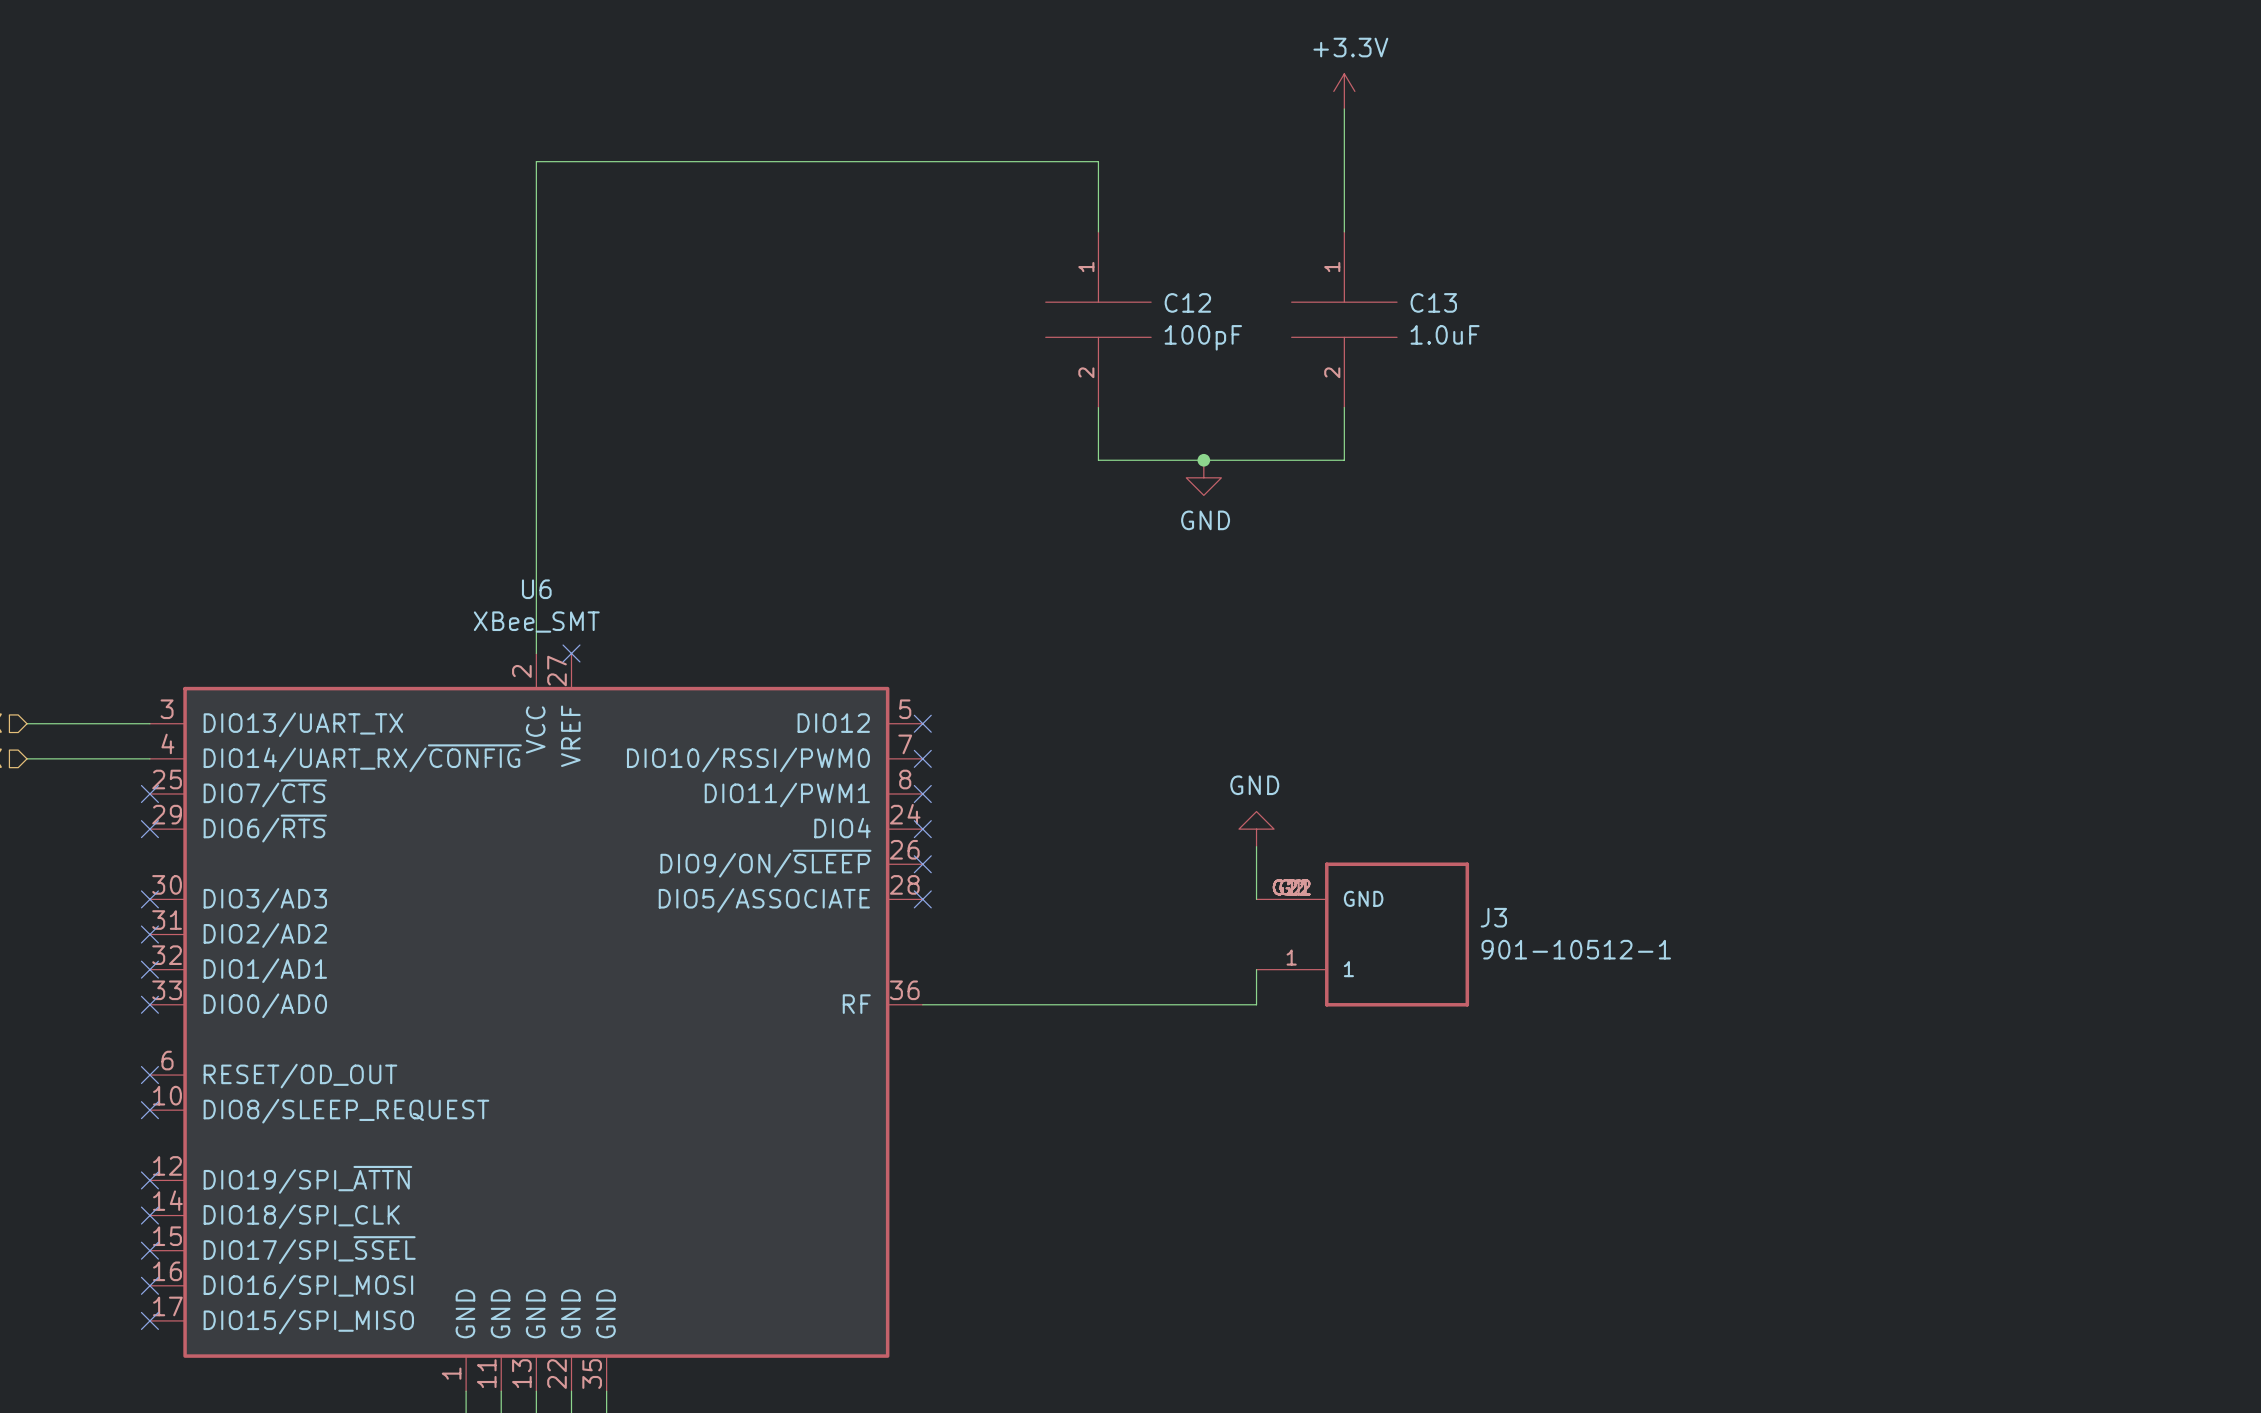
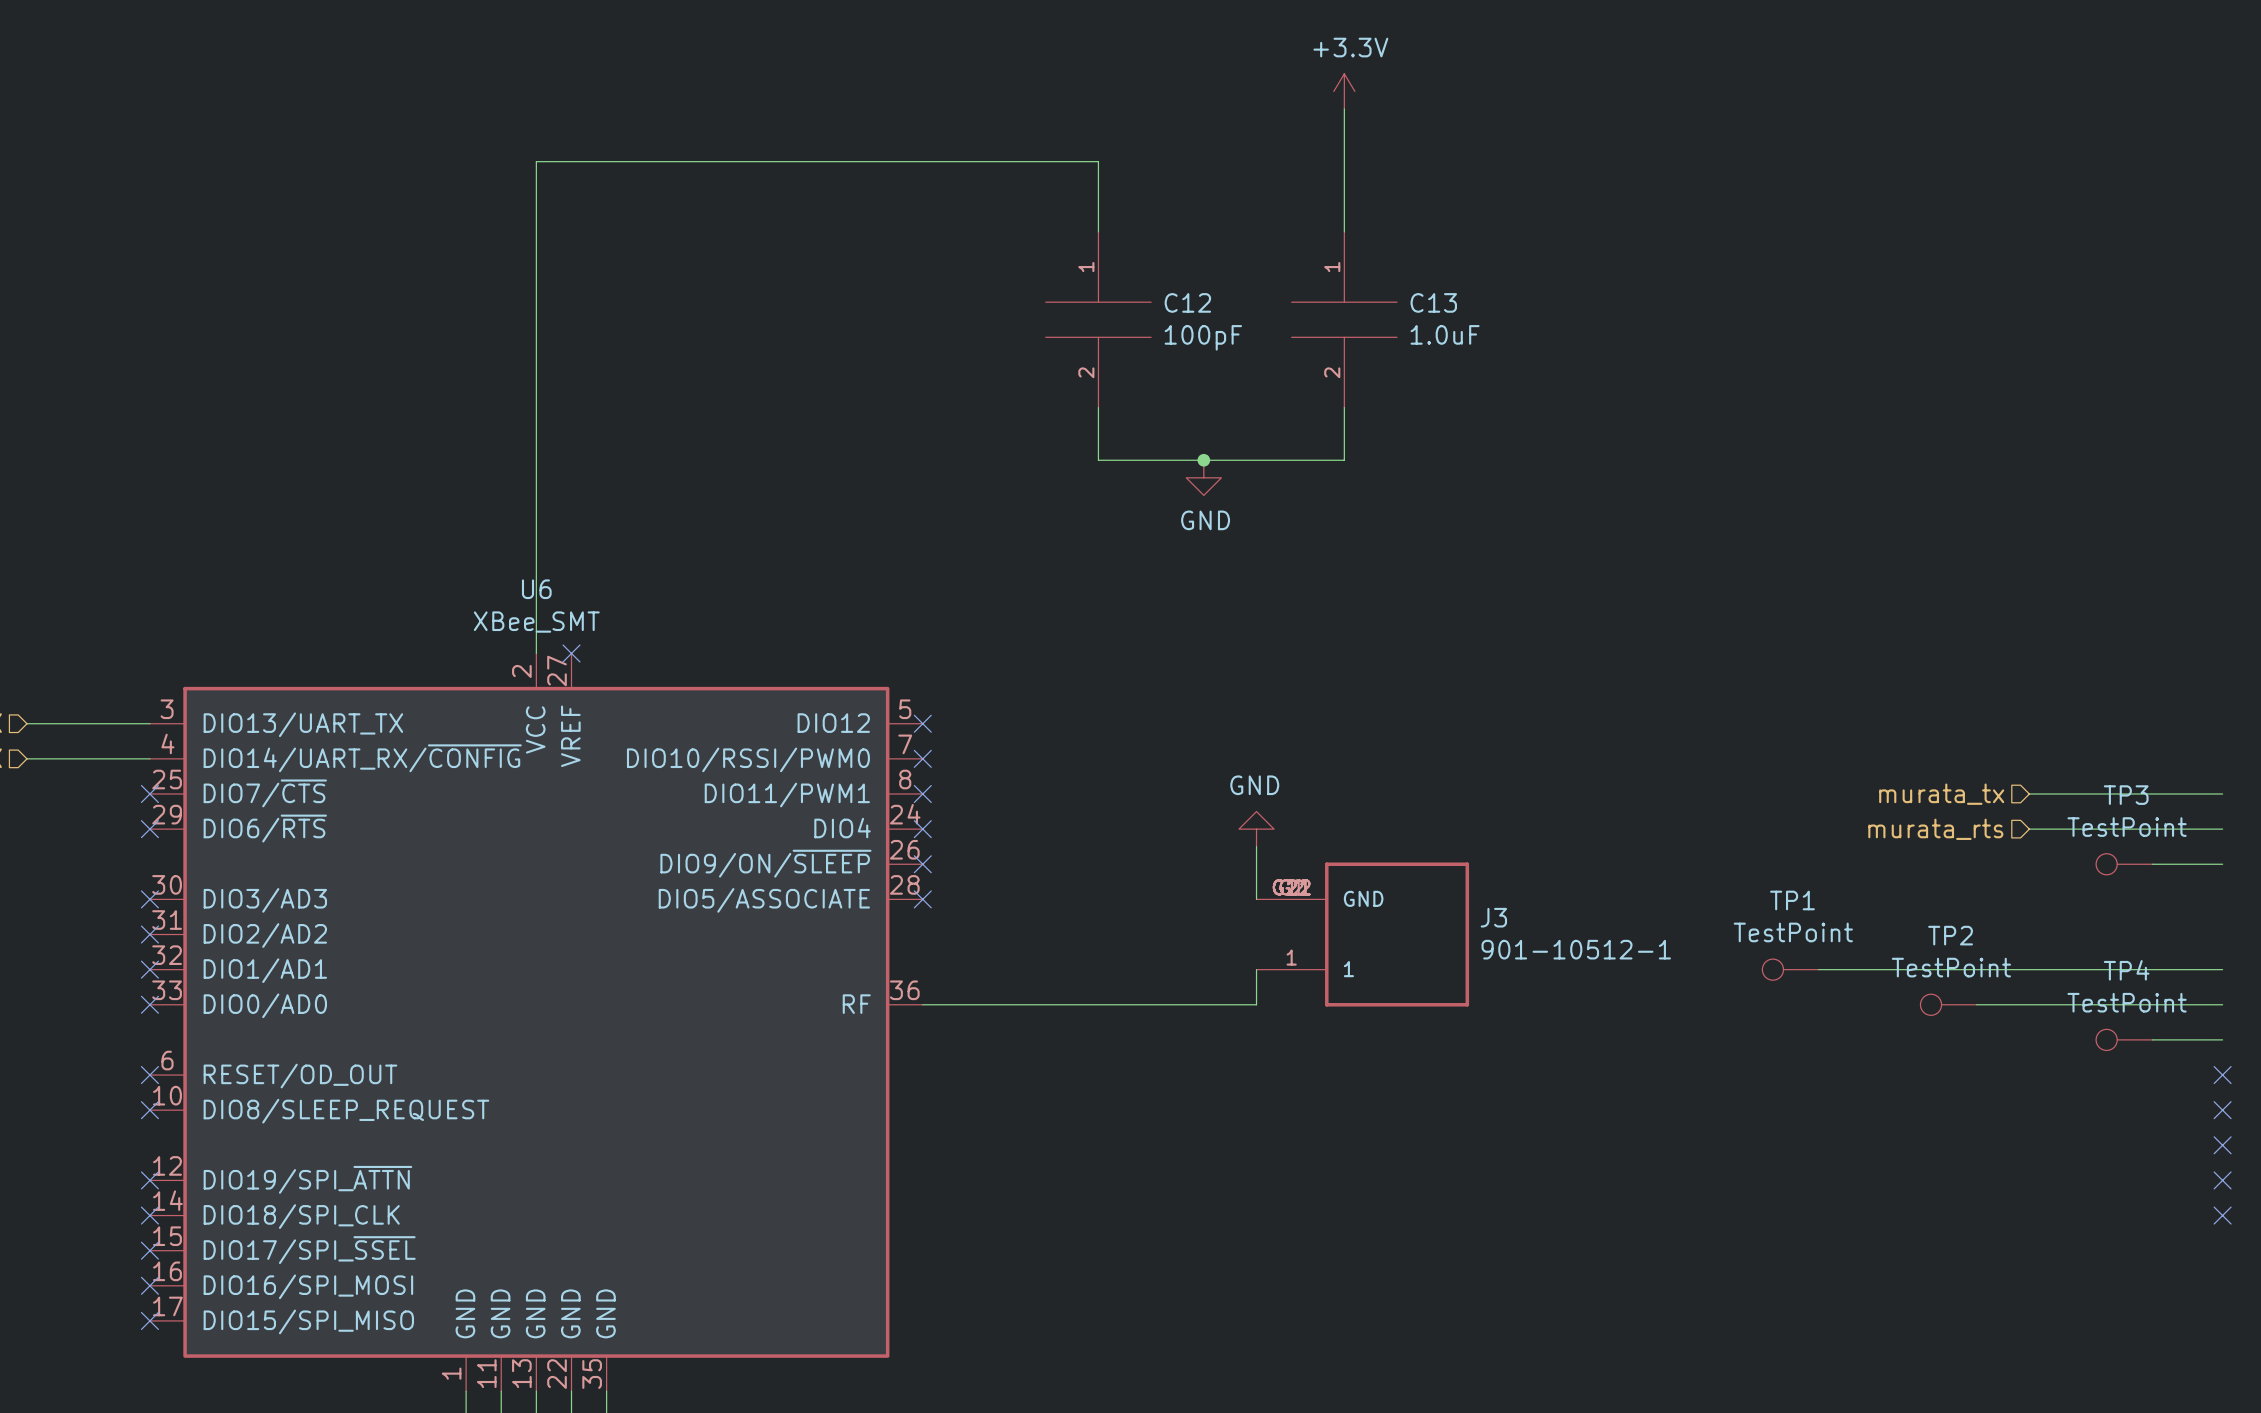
wire: none -> (2029, 793) (2222, 793)
hierarchical label: none -> murata_tx (1941, 794)
hierarchical label: none -> murata_rts (1935, 829)
wire: none -> (2029, 829) (2222, 829)
TP3: none -> TestPoint (2124, 864)
wire: none -> (2152, 864) (2222, 864)
TP1: none -> TestPoint (1790, 969)
wire: none -> (1818, 969) (2222, 969)
TP2: none -> TestPoint (1948, 1004)
wire: none -> (1976, 1004) (2222, 1004)
TP4: none -> TestPoint (2124, 1039)
wire: none -> (2152, 1039) (2222, 1039)
no-connect mark: none -> (2222, 1075)
no-connect mark: none -> (2222, 1110)
no-connect mark: none -> (2222, 1145)
no-connect mark: none -> (2222, 1180)
no-connect mark: none -> (2222, 1215)

